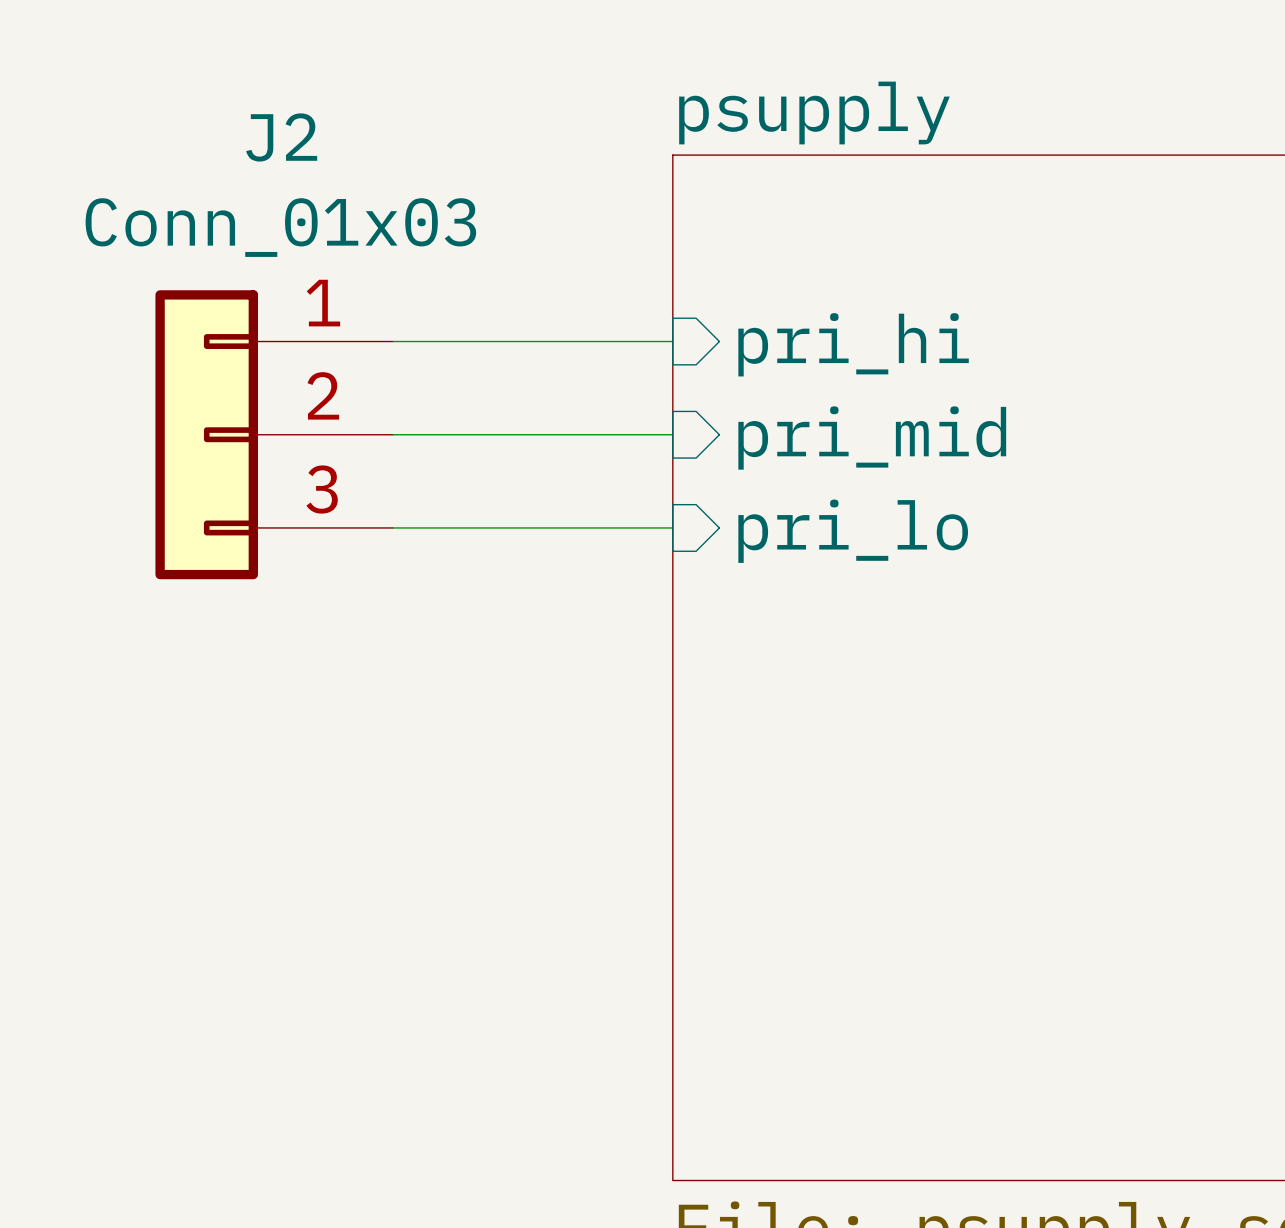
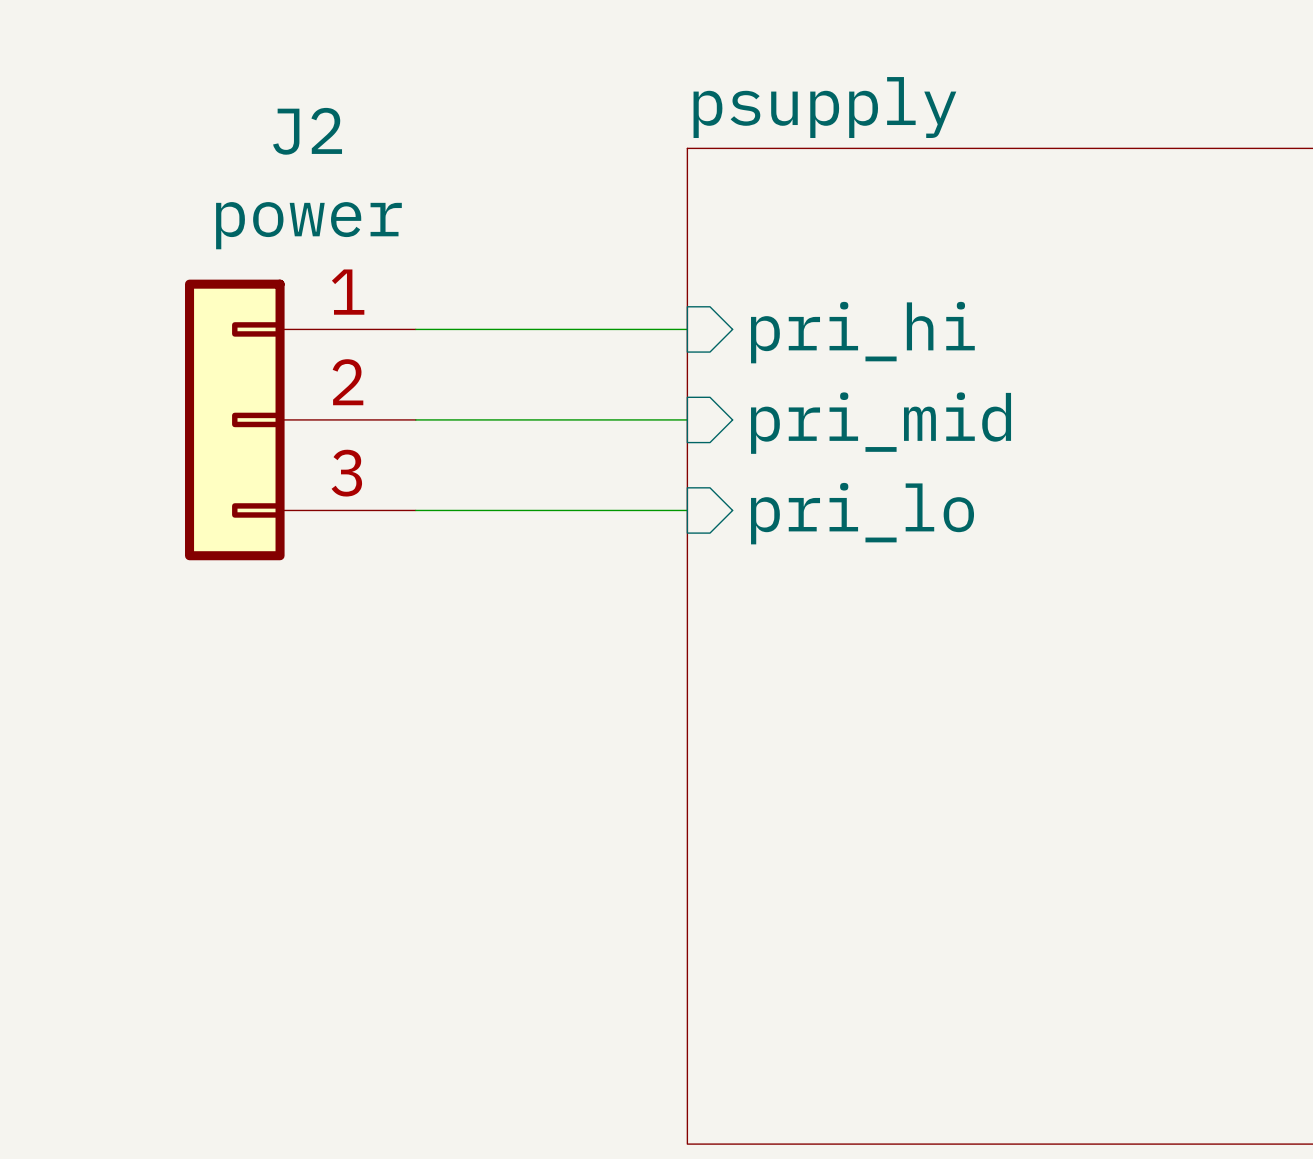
J2 value: Conn_01x03 (280, 227) -> power (308, 225)

